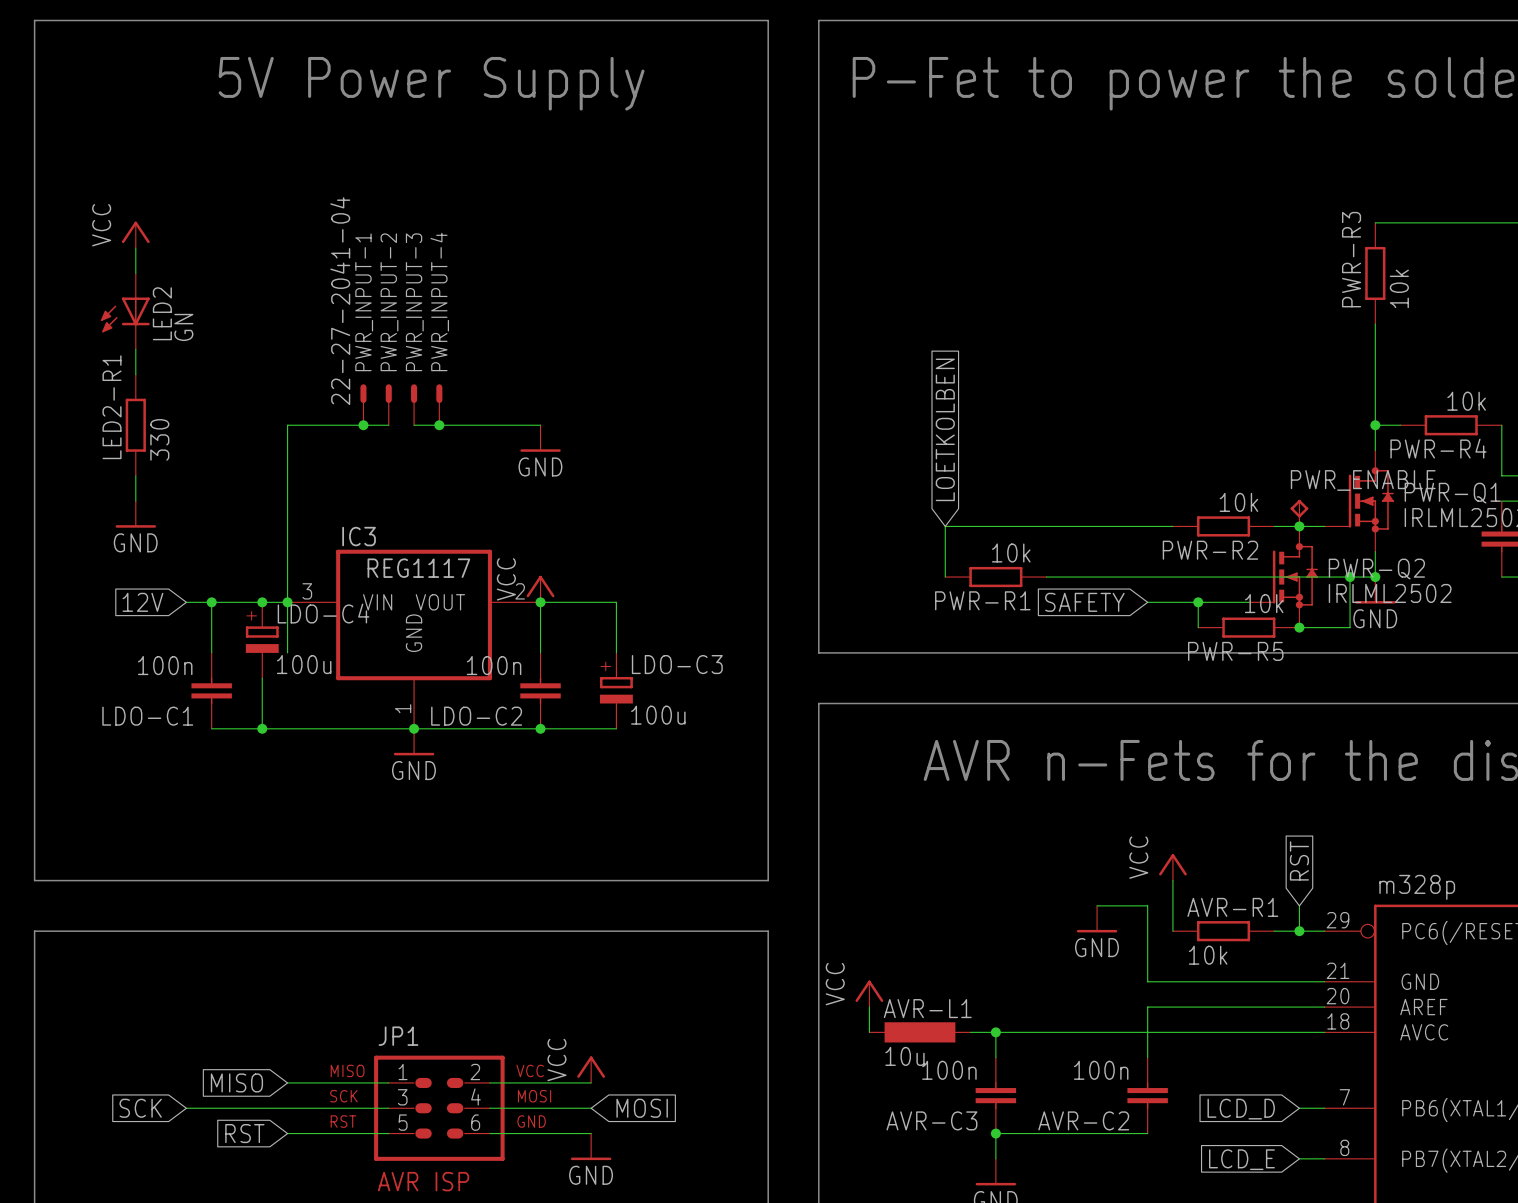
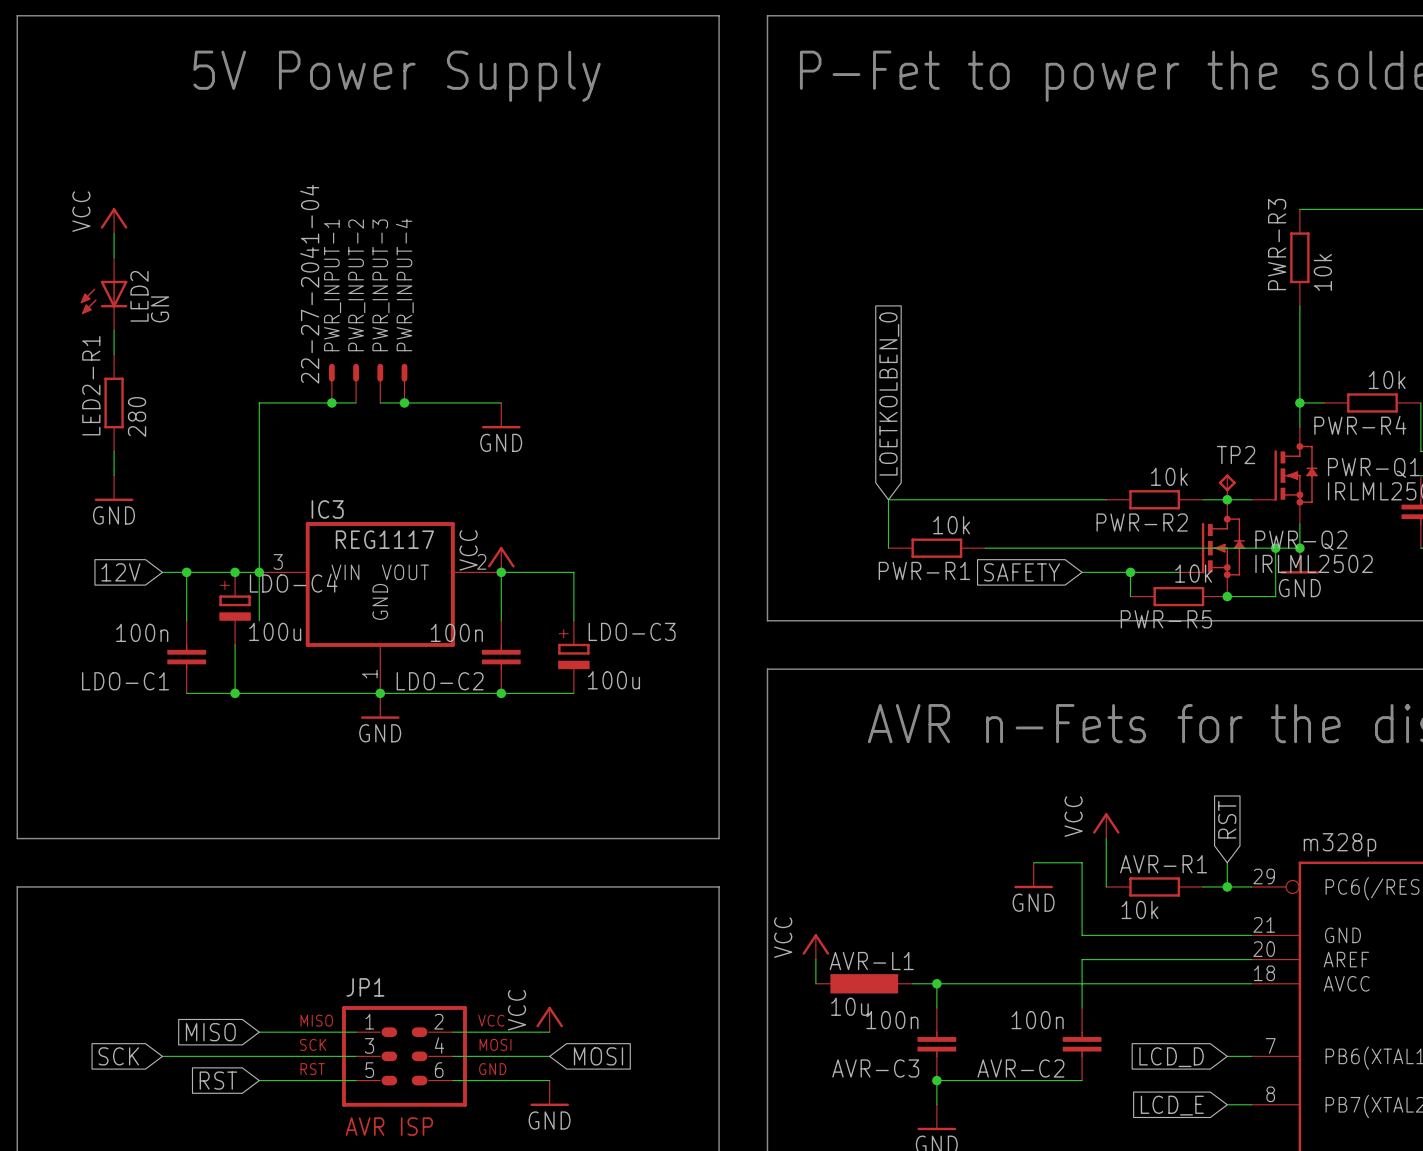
global label: LOETKOLBEN (945, 429) -> LOETKOLBEN_0 (889, 393)
LED2-R1 value: 330 (159, 439) -> 280 (137, 416)
PWR_ENABLE name: PWR_ENABLE (1363, 480) -> TP2 (1236, 455)

